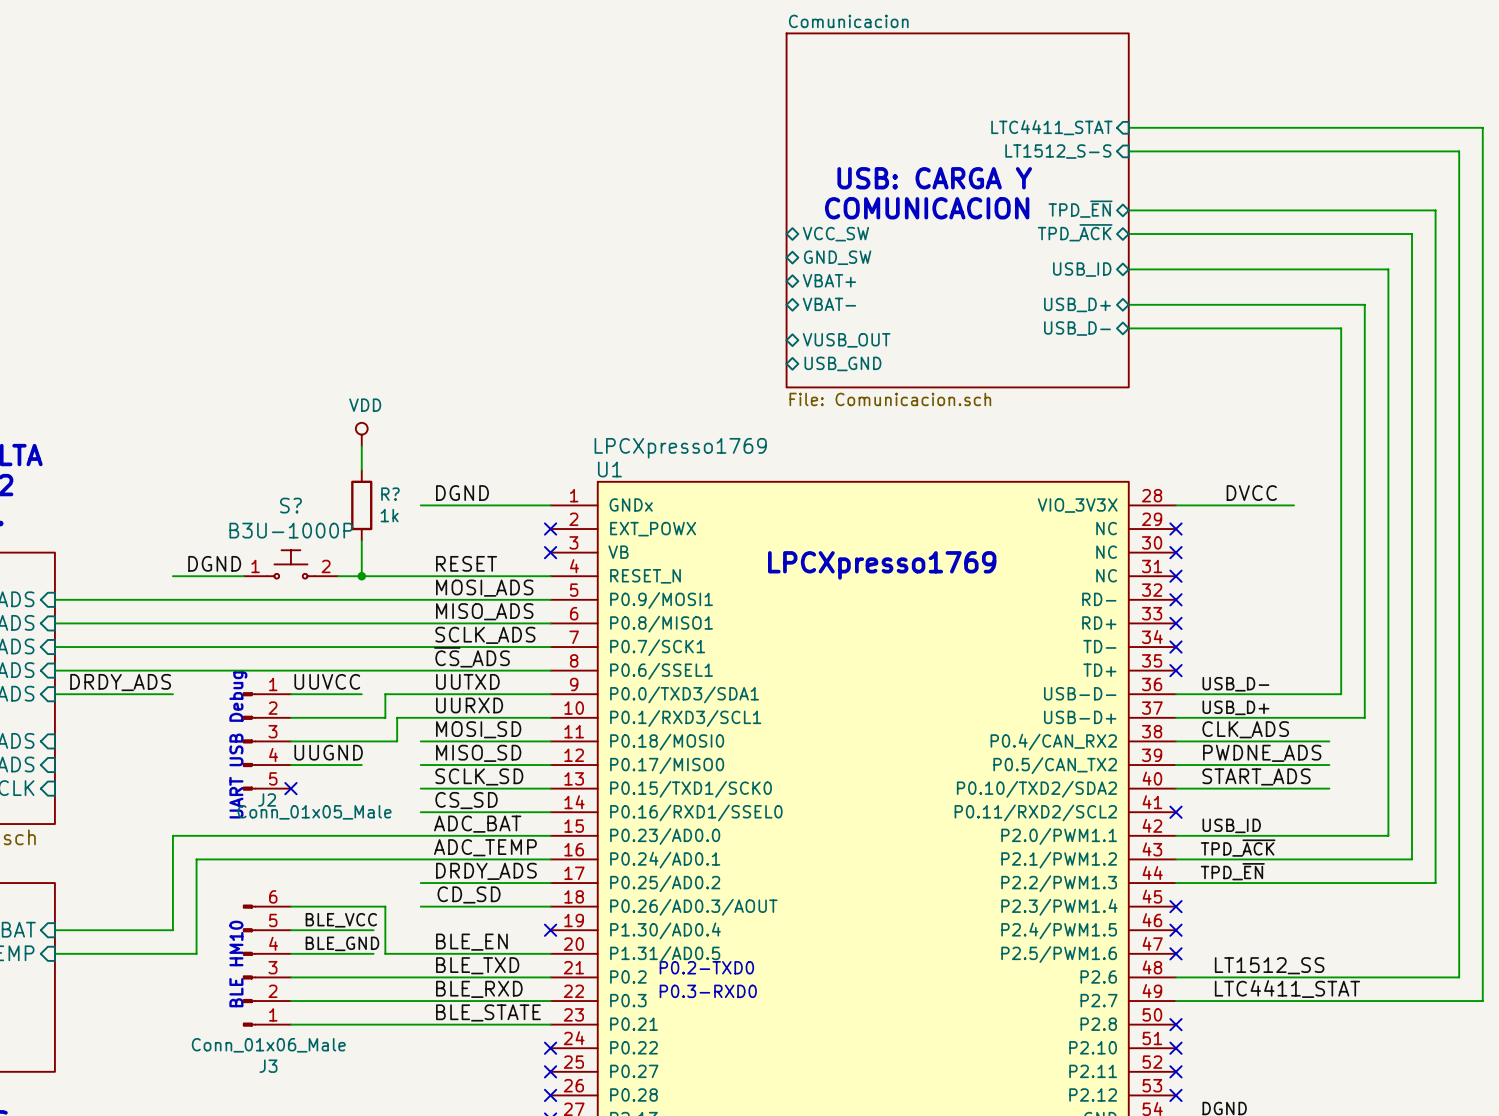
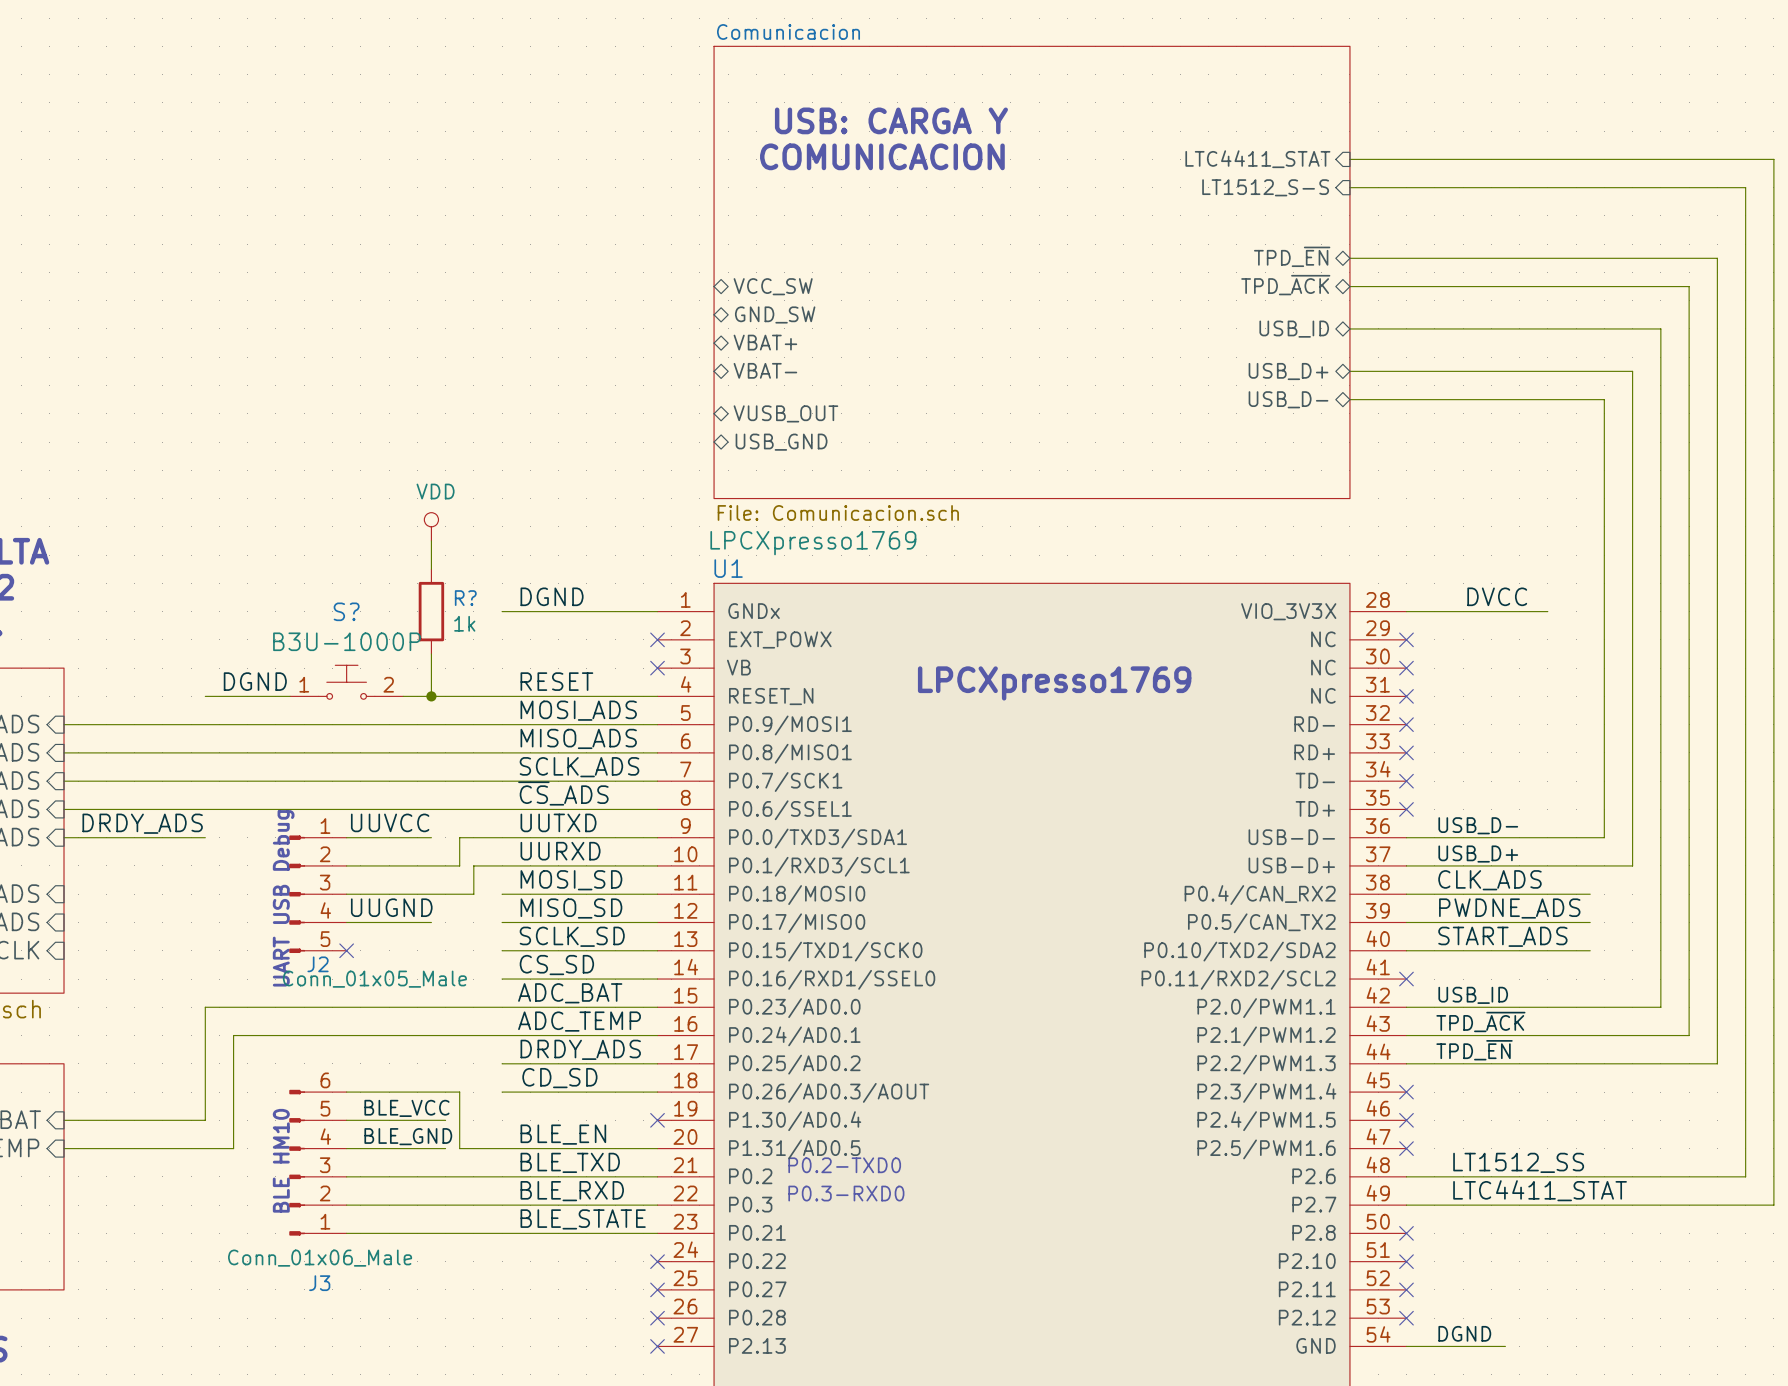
text position: USB: CARGA Y (934, 178) -> USB: CARGA Y (891, 120)
text position: COMUNICACION (927, 208) -> COMUNICACION (882, 156)
sheet Comunicacion: File: Comunicacion.sch (957, 210) -> none
sheet Comunicacion: none -> File: Comunicacion.sch (1032, 272)
sheet pin position: VCC_SW (835, 234) -> VCC_SW (773, 286)
sheet pin position: GND_SW (837, 257) -> GND_SW (775, 314)
sheet pin position: VBAT+ (829, 280) -> VBAT+ (765, 342)
sheet pin position: VBAT- (829, 304) -> VBAT- (765, 370)
sheet pin position: VUSB_OUT (846, 340) -> VUSB_OUT (785, 413)
sheet pin position: USB_GND (842, 363) -> USB_GND (781, 442)

